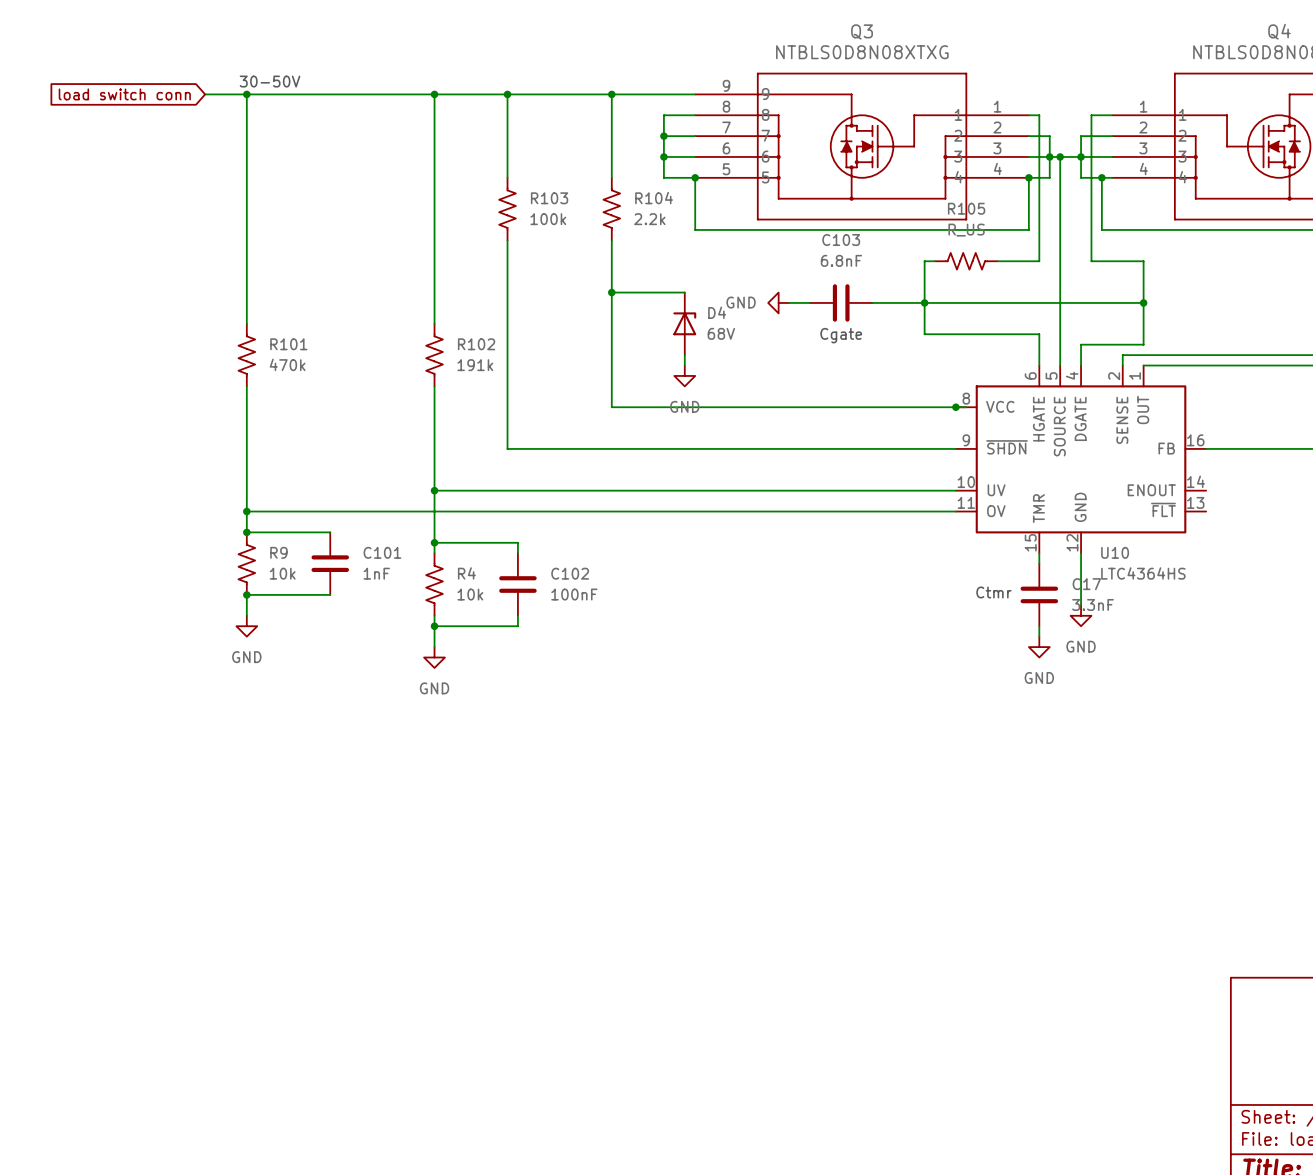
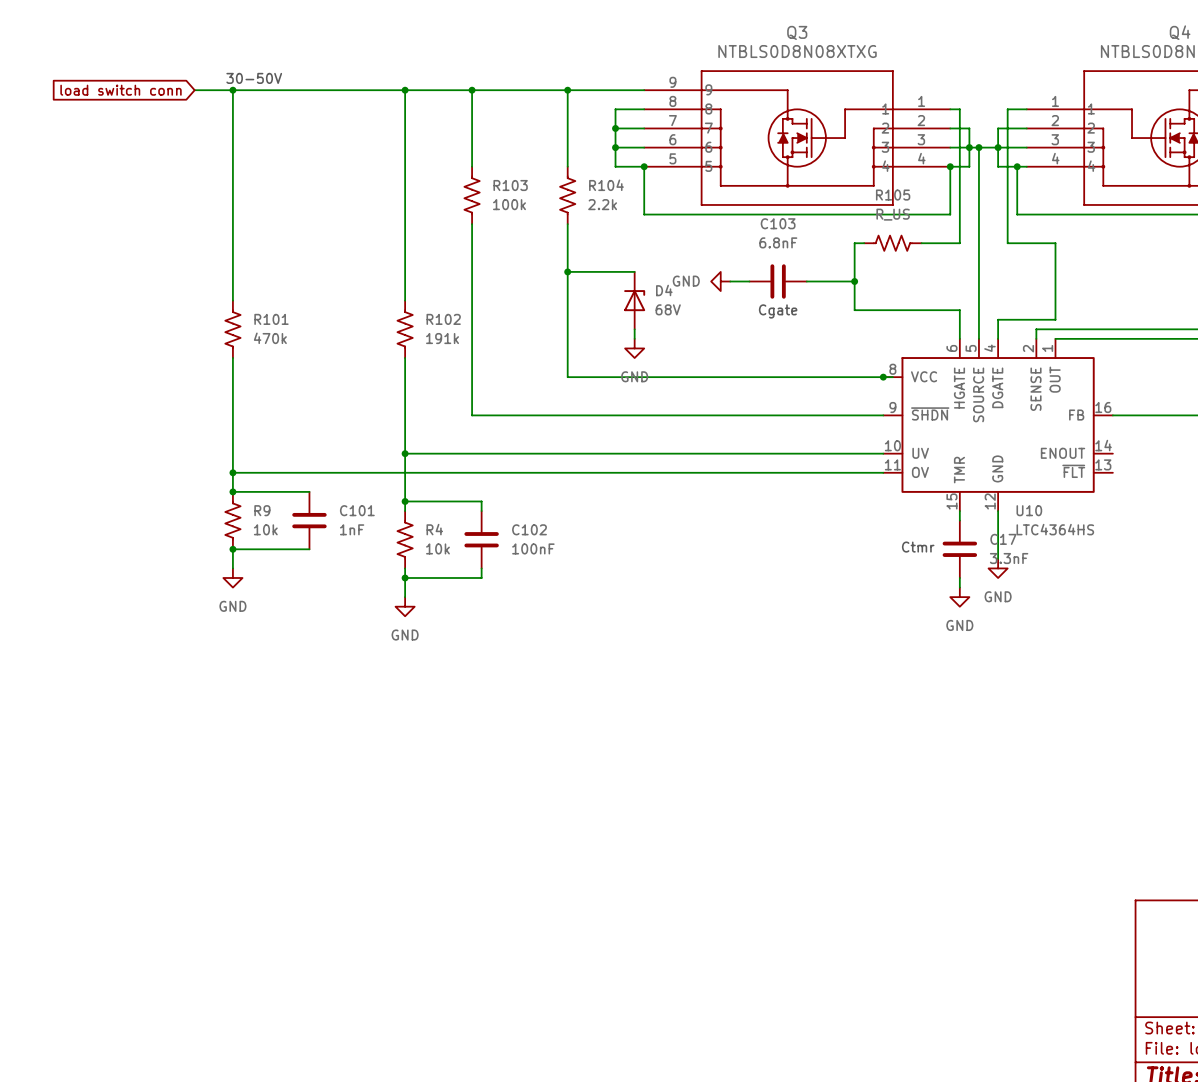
wire: (924, 302) (1143, 302) -> none
junction: (1143, 302) -> none

